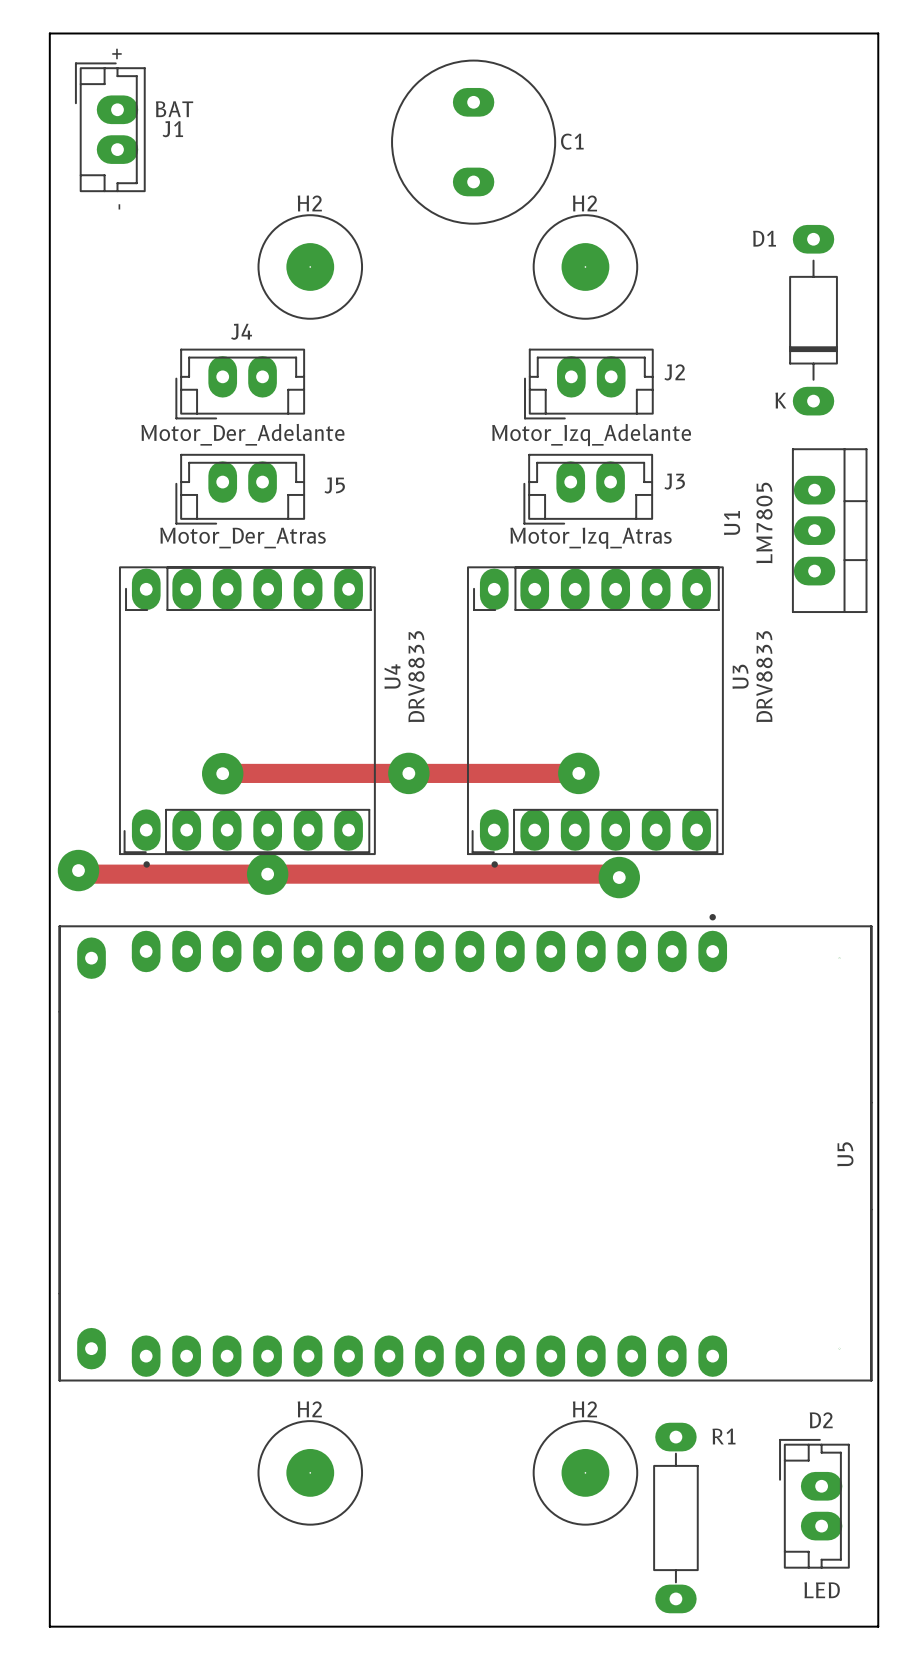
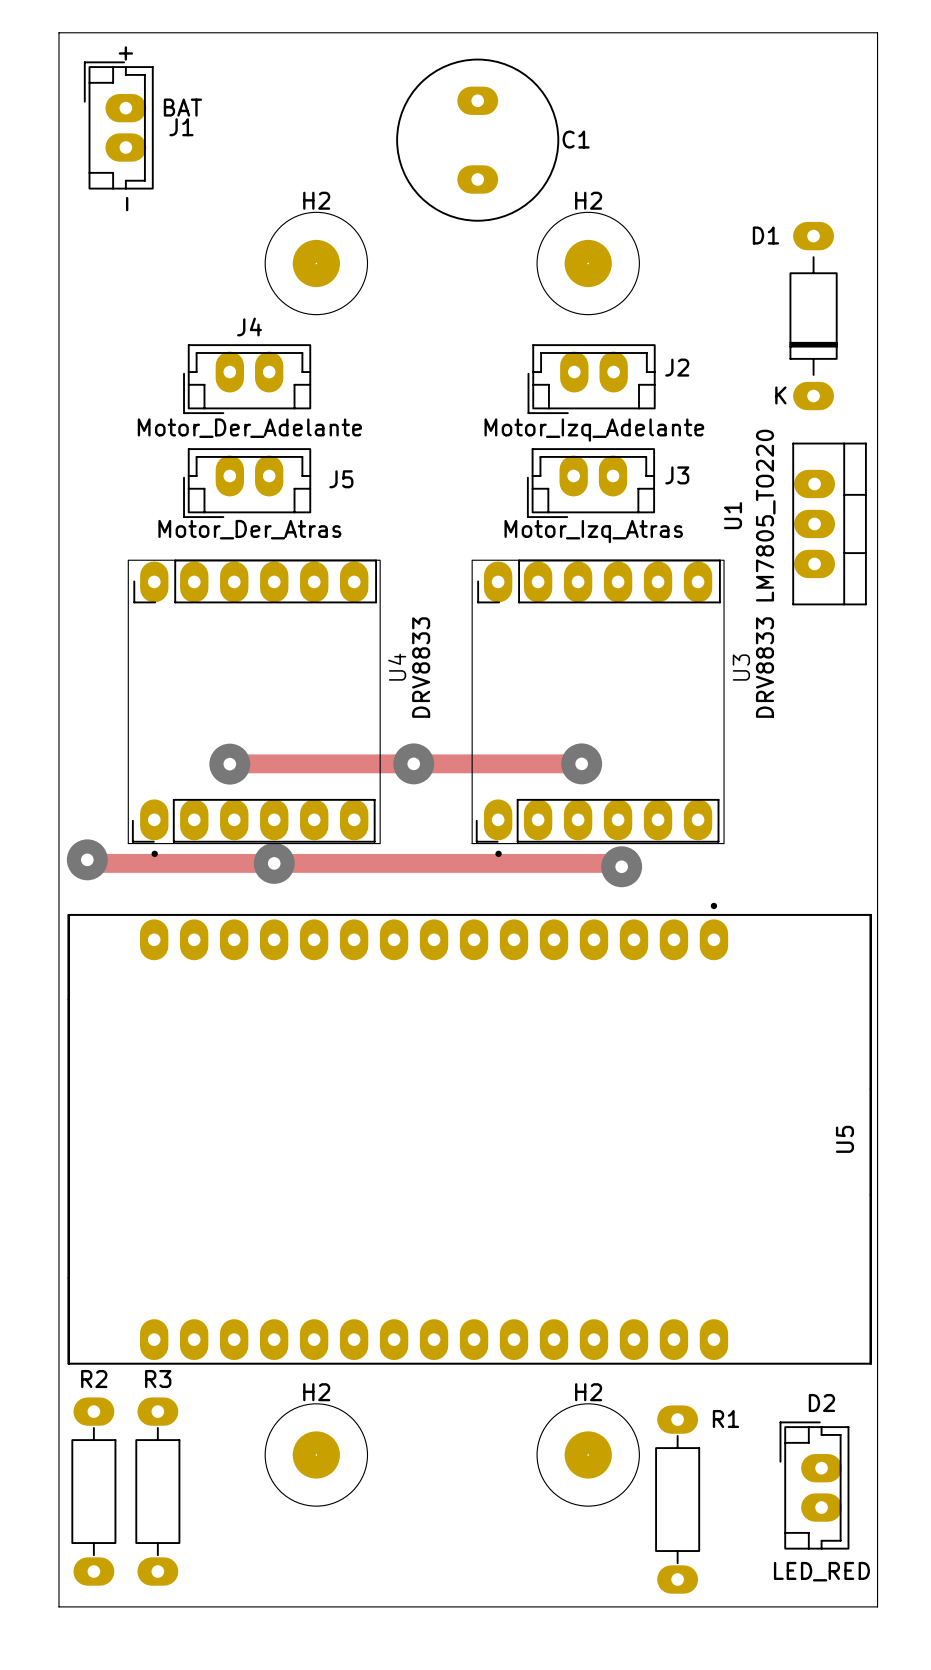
U1 value: LM7805 (764, 523) -> LM7805_TO220 (765, 515)
U5 footprint: [58, 914, 873, 1382] -> [67, 902, 872, 1365]
R2: none -> (93, 1491)
R3: none -> (157, 1491)
D2 value: LED (822, 1590) -> LED_RED (821, 1571)

